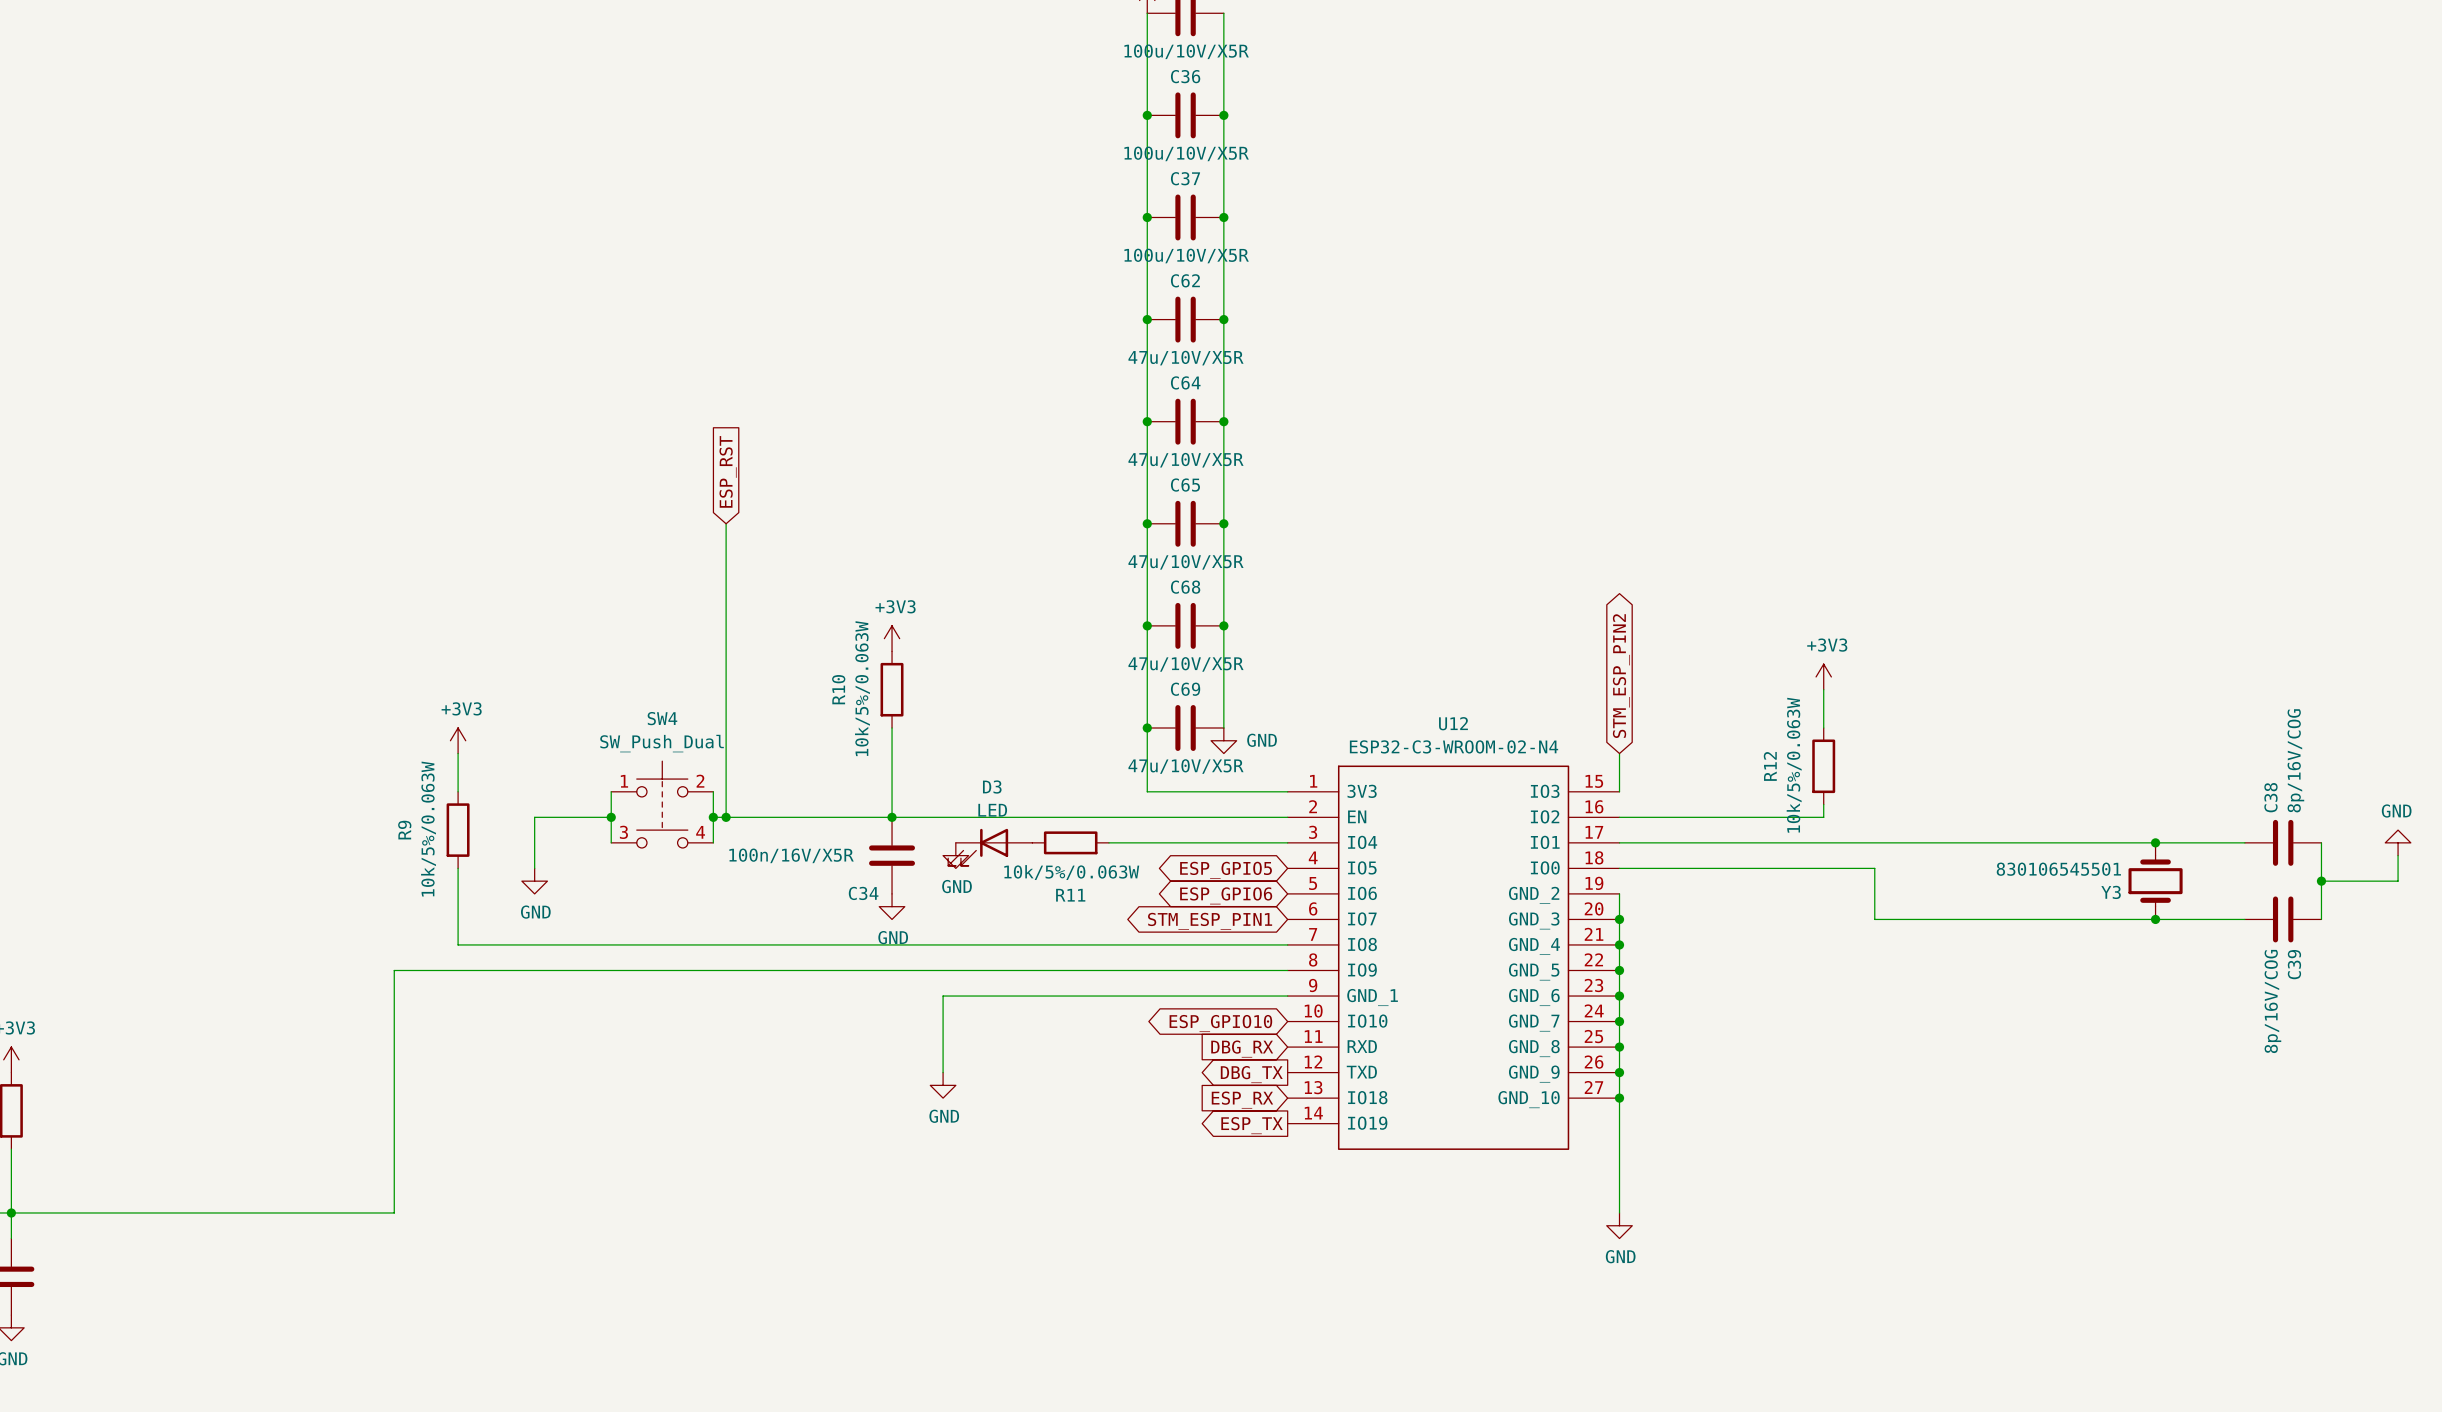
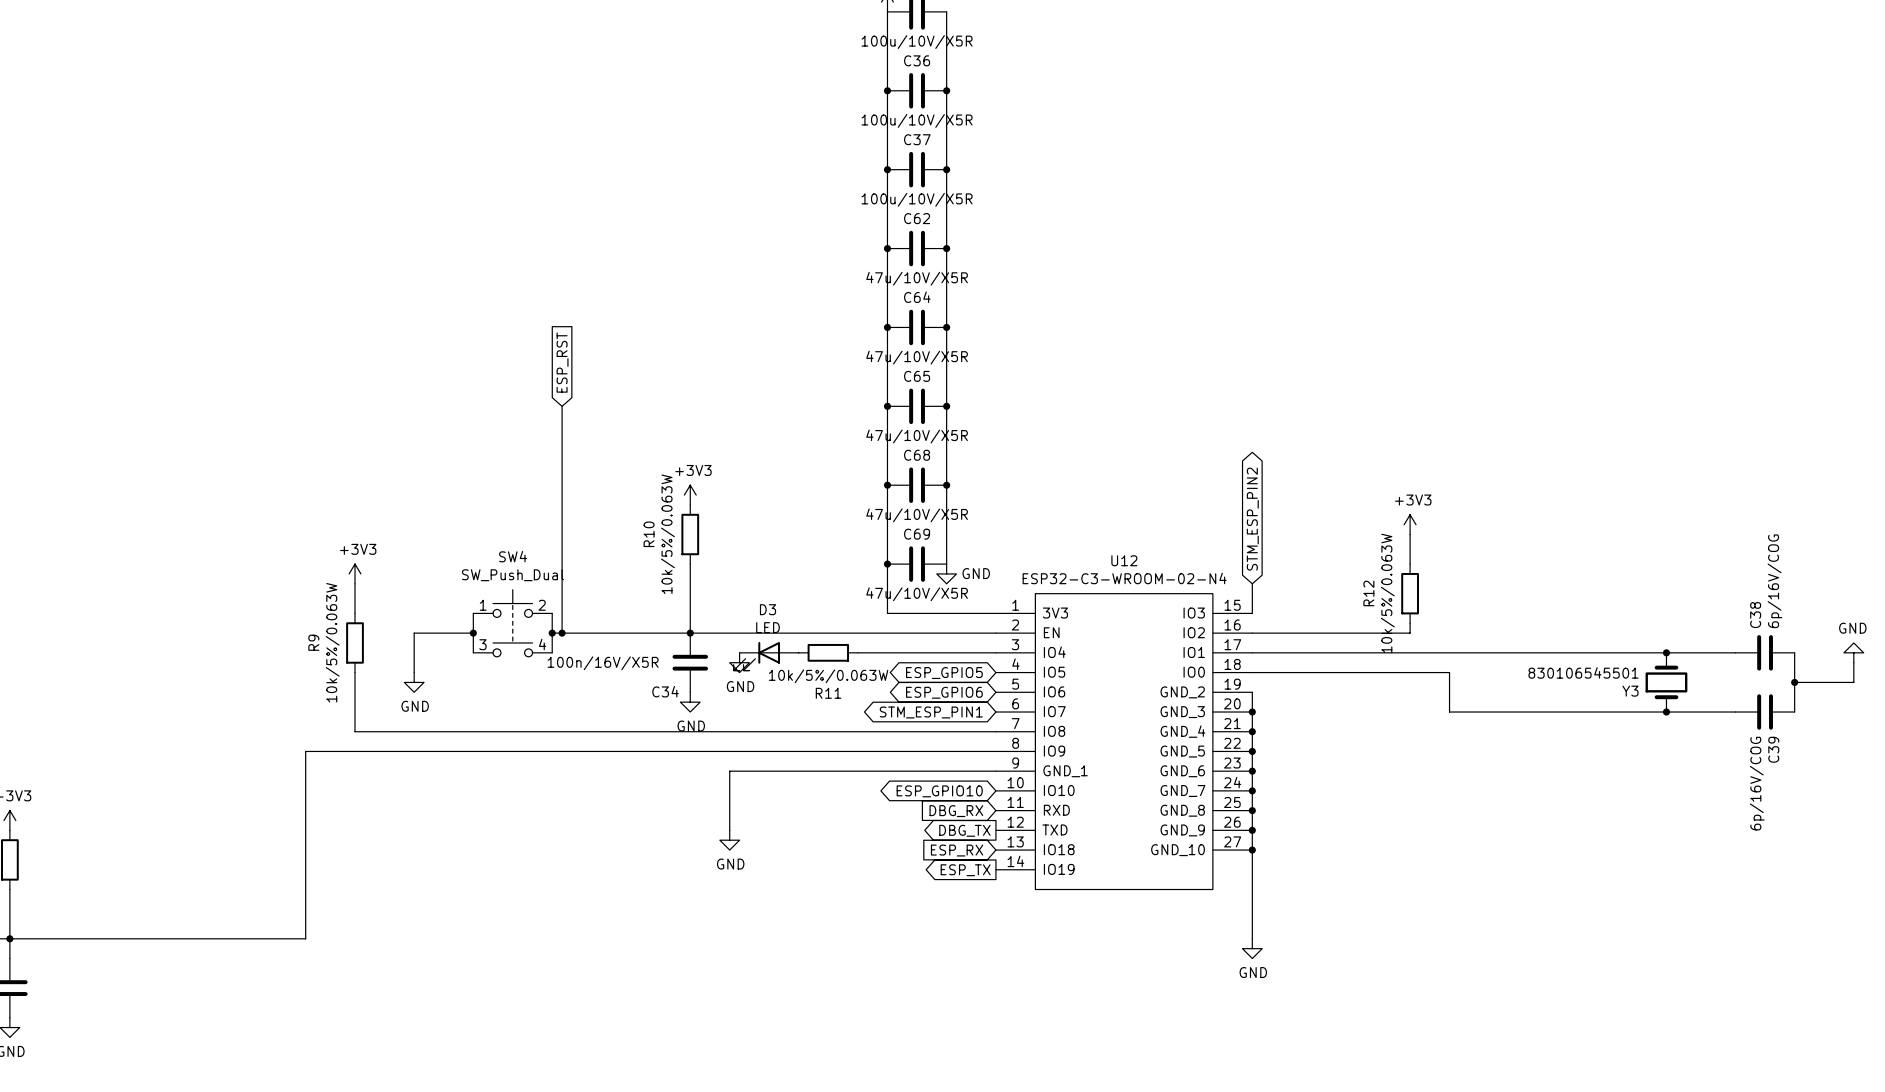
C38 value: 8p/16V/COG (2295, 760) -> 6p/16V/COG (1774, 581)
C39 value: 8p/16V/COG (2272, 1001) -> 6p/16V/COG (1757, 783)

